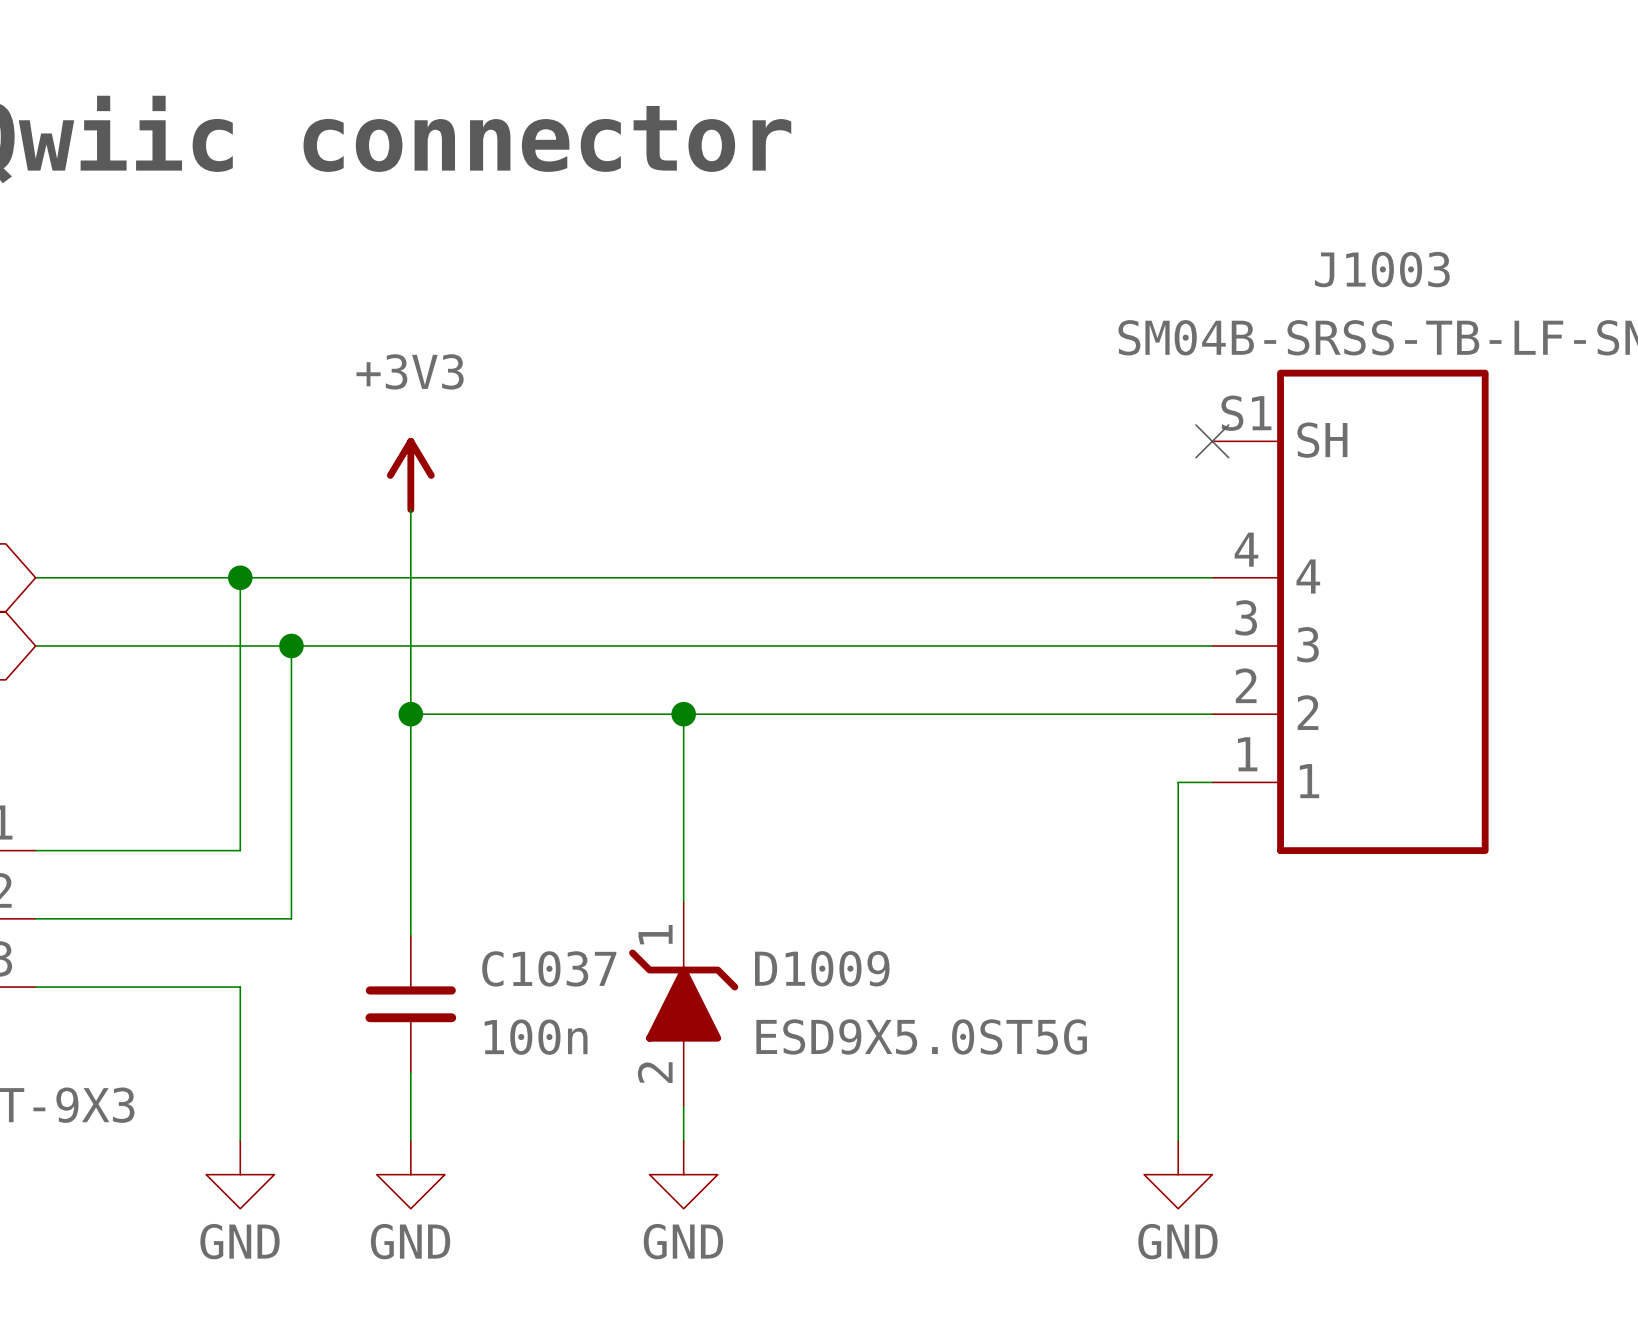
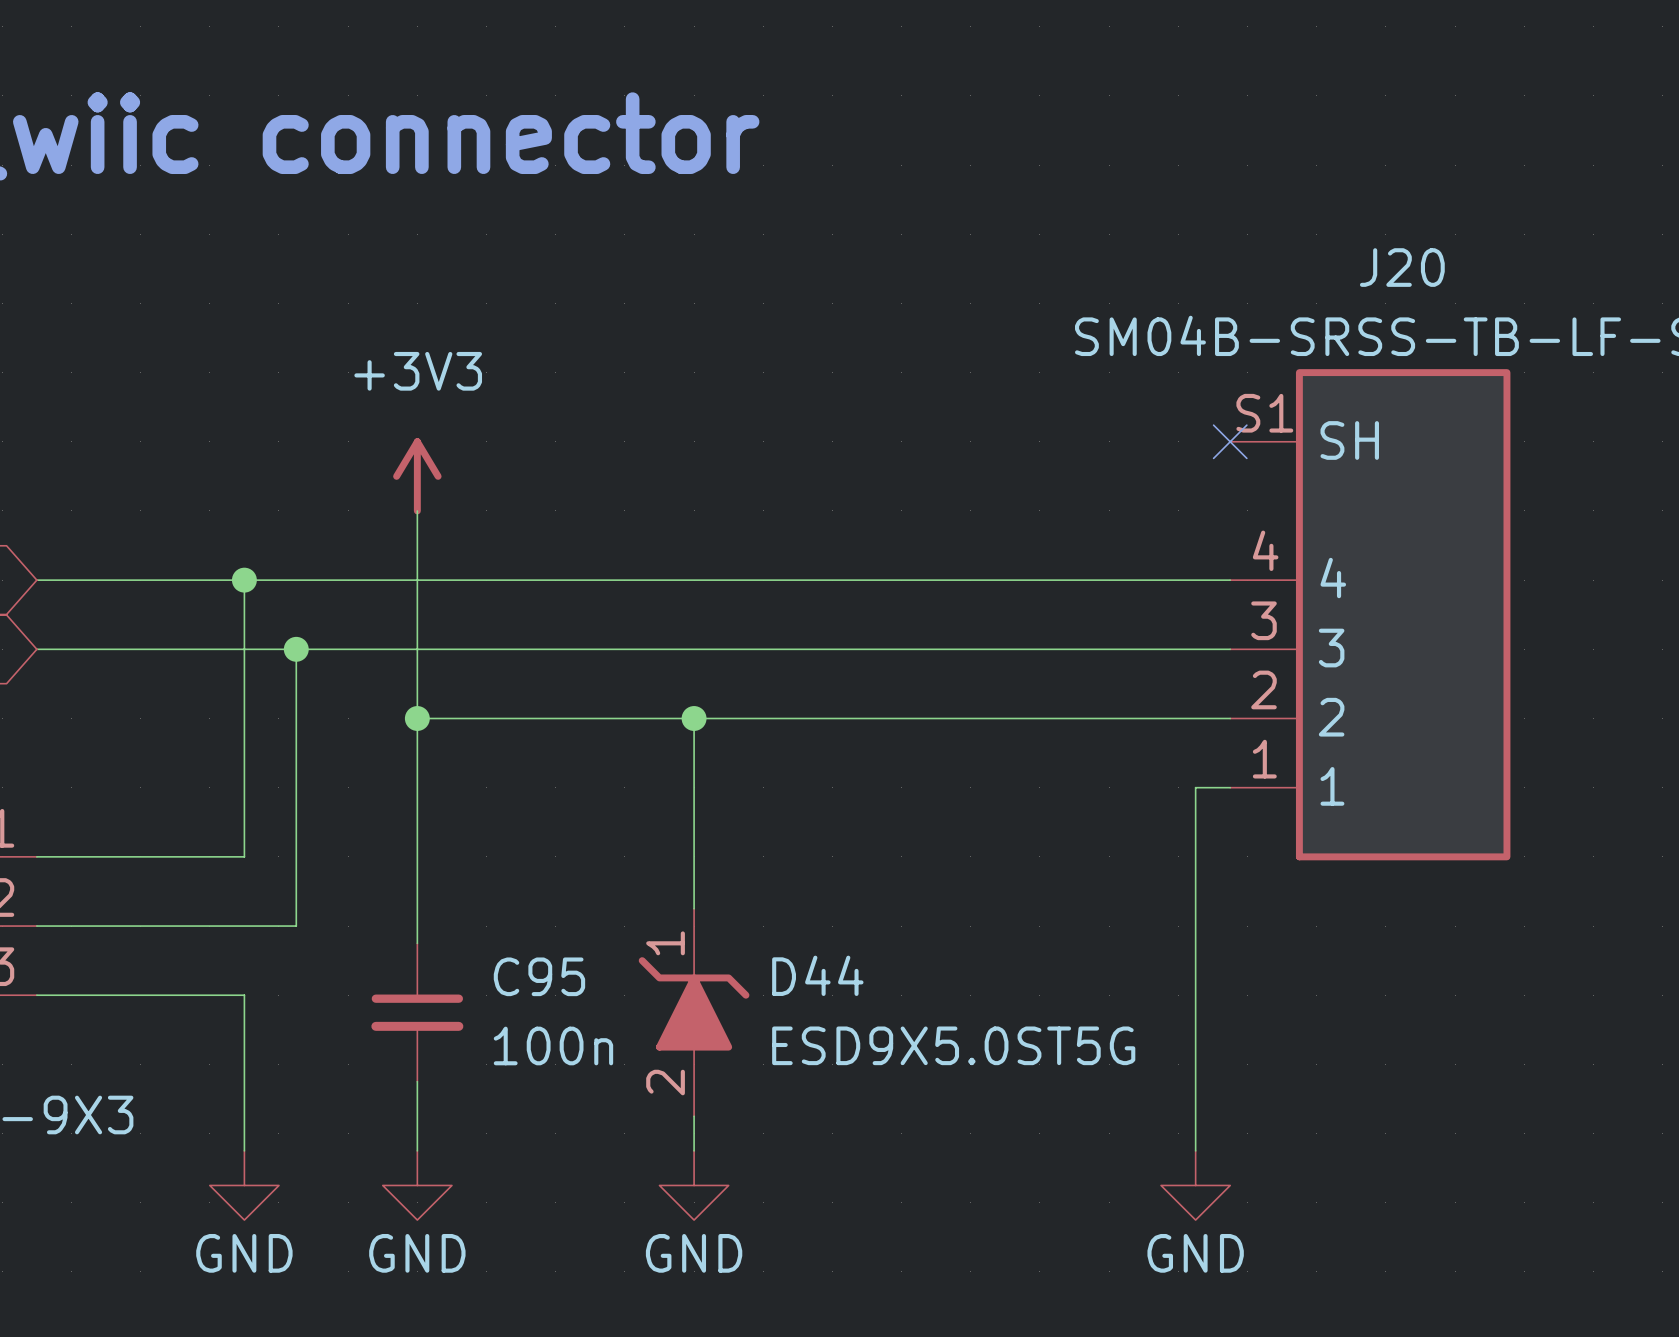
J1003 name: J1003 (1382, 269) -> J20 (1402, 267)
C1037 name: C1037 (549, 968) -> C95 (539, 976)
D1009 name: D1009 (822, 968) -> D44 (817, 975)

